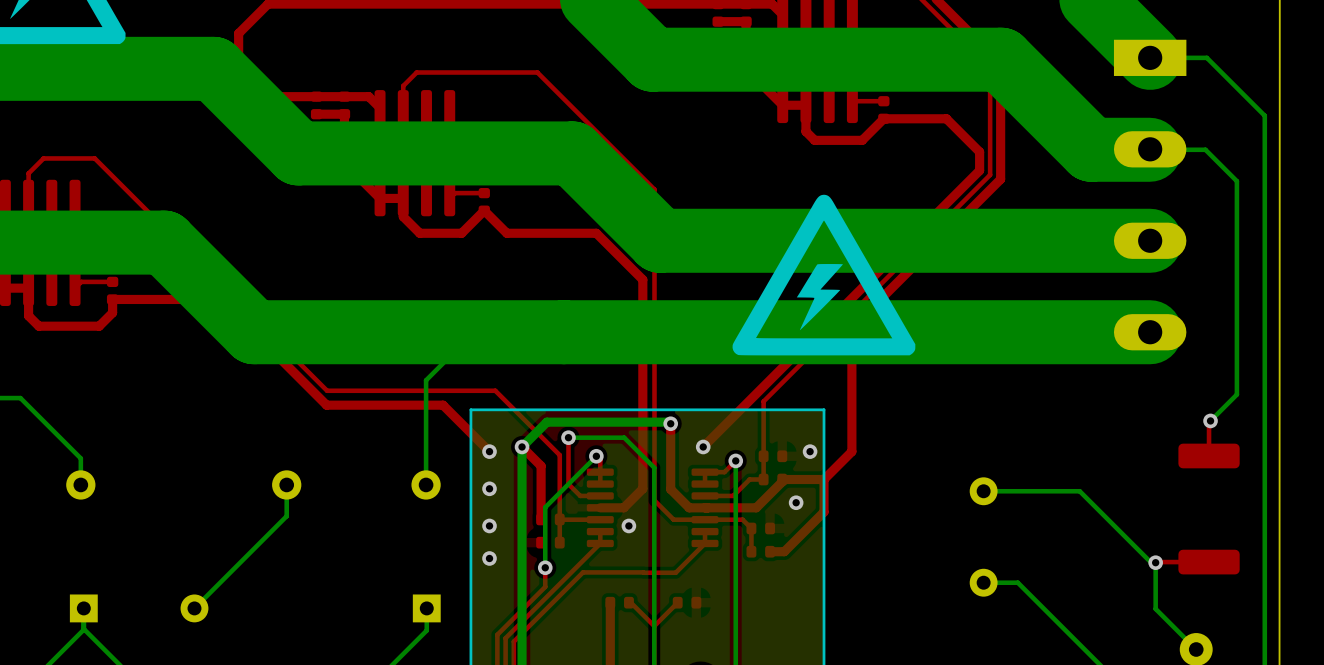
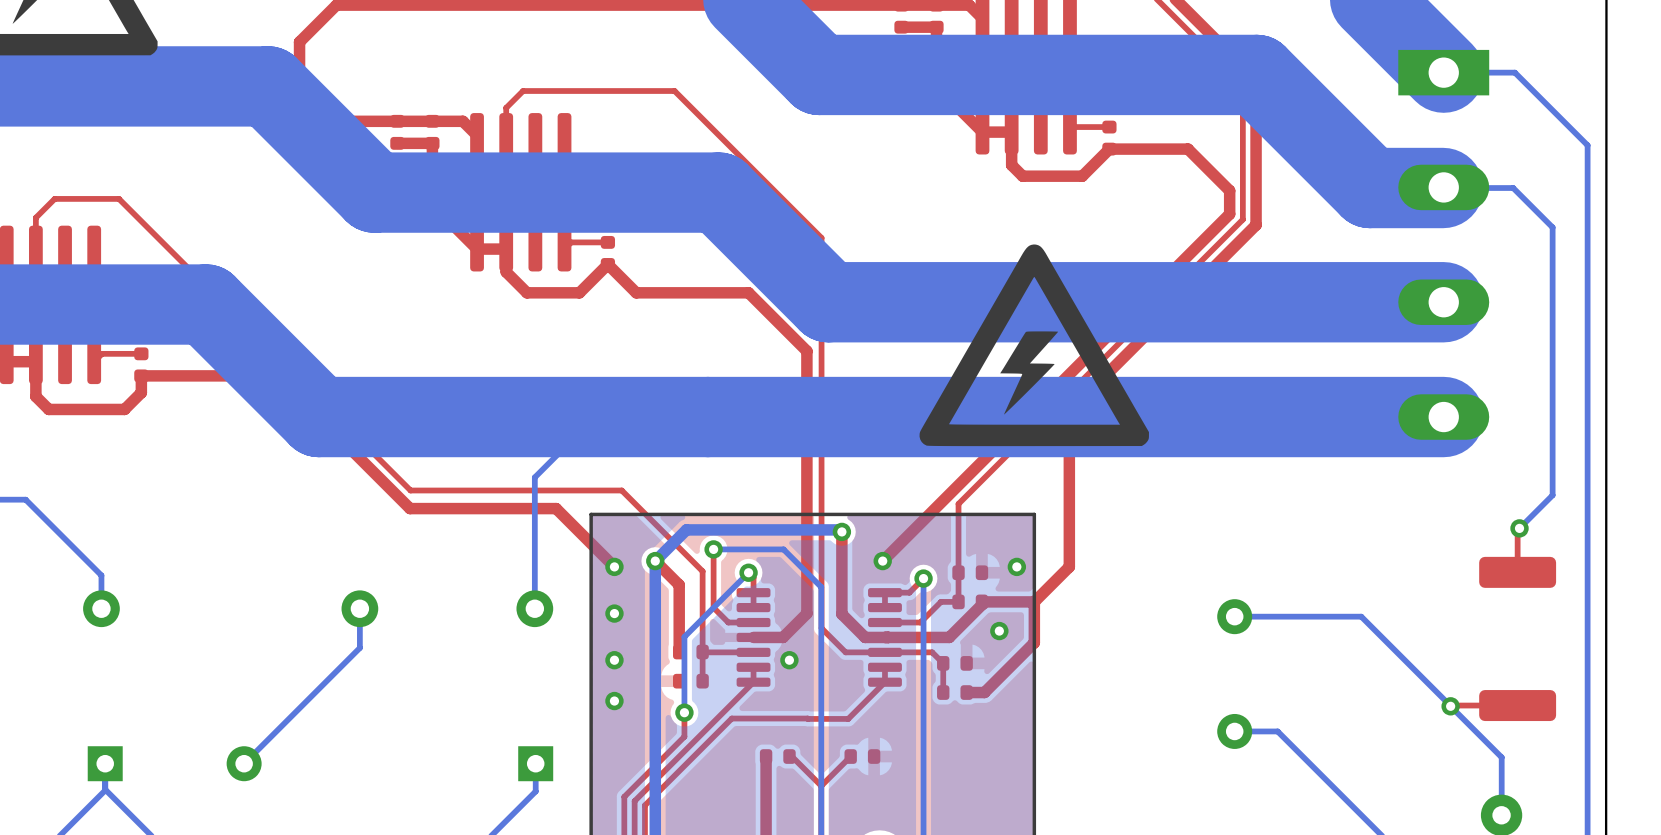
bottom track: (1079, 491) (1151, 562) (1155, 562) (1155, 608) (1196, 649) -> (1355, 616) (1361, 616) (1450, 706)
bottom track: none -> (1450, 706) (1501, 757) (1501, 815)

